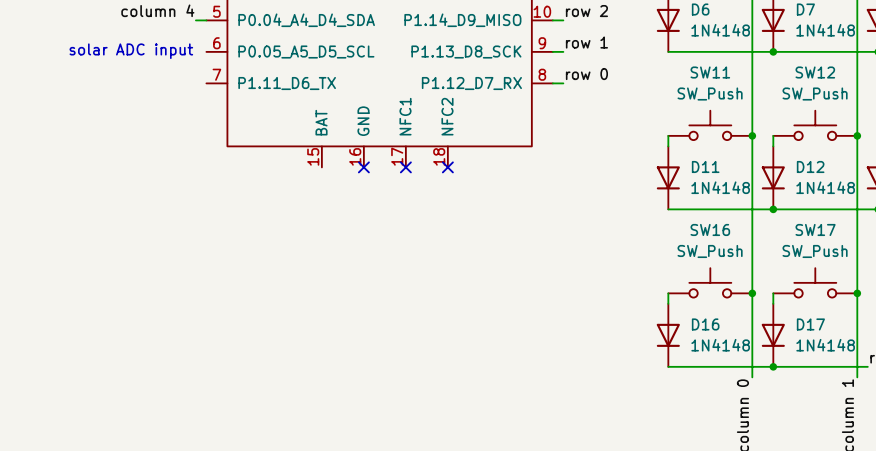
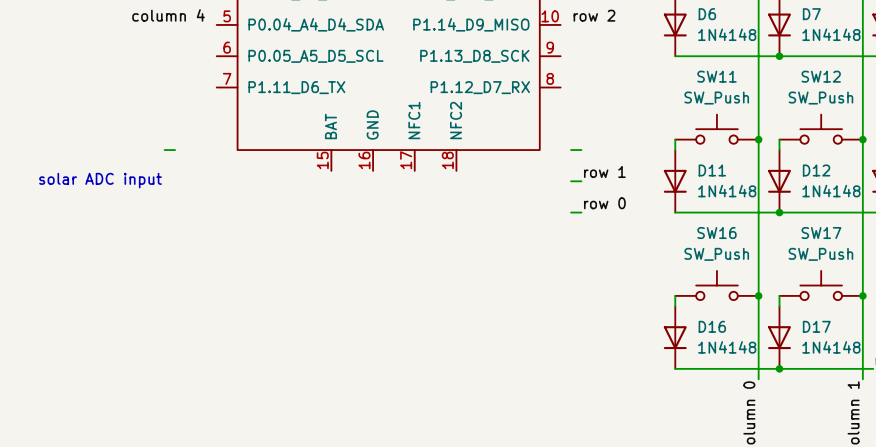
wire: (195, 20) (206, 20) -> (164, 150) (175, 150)
wire: (552, 20) (563, 20) -> (571, 150) (581, 150)
label position: row 1 (586, 42) -> row 1 (604, 172)
text position: solar ADC input (131, 51) -> solar ADC input (100, 180)
wire: (552, 51) (563, 51) -> (571, 181) (581, 181)
label position: row 0 (586, 74) -> row 0 (604, 203)
wire: (552, 83) (563, 83) -> (571, 212) (581, 212)
no-connect mark: (363, 167) -> none
no-connect mark: (405, 167) -> none
no-connect mark: (447, 167) -> none

